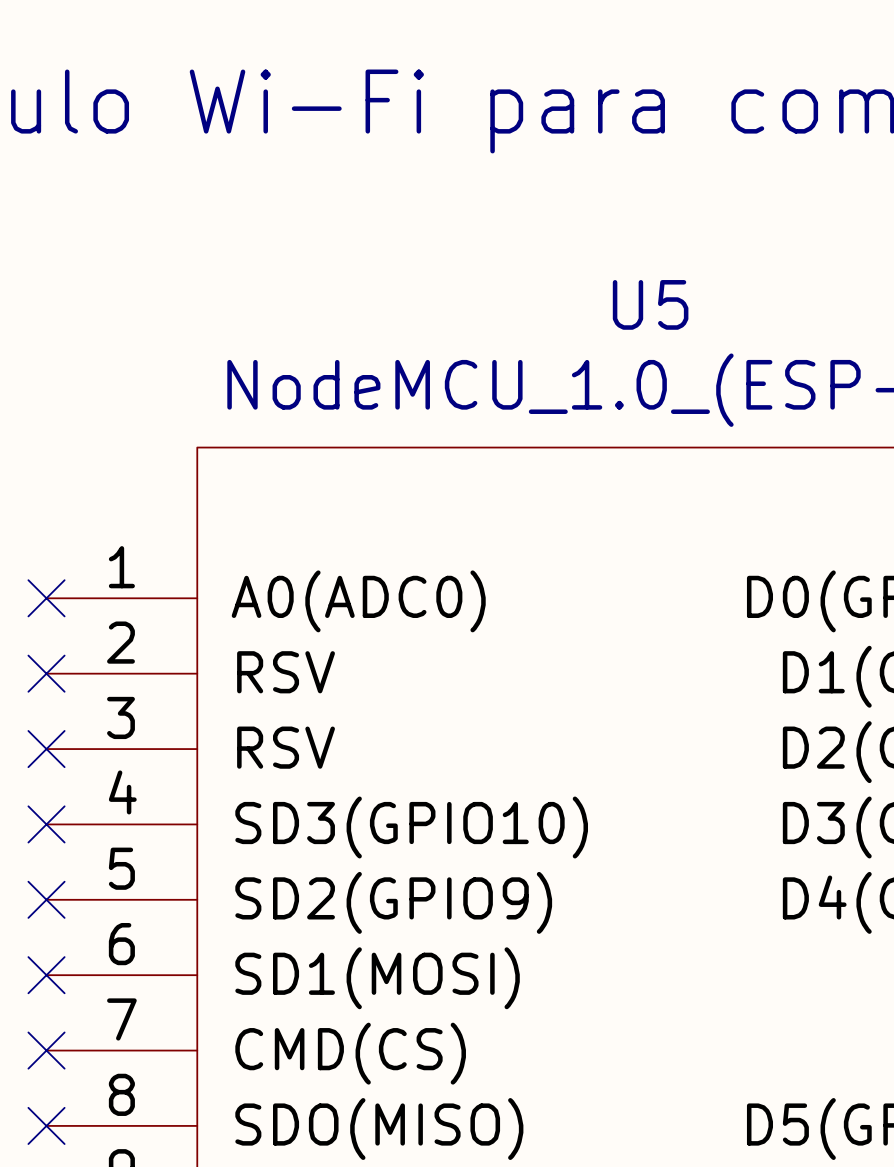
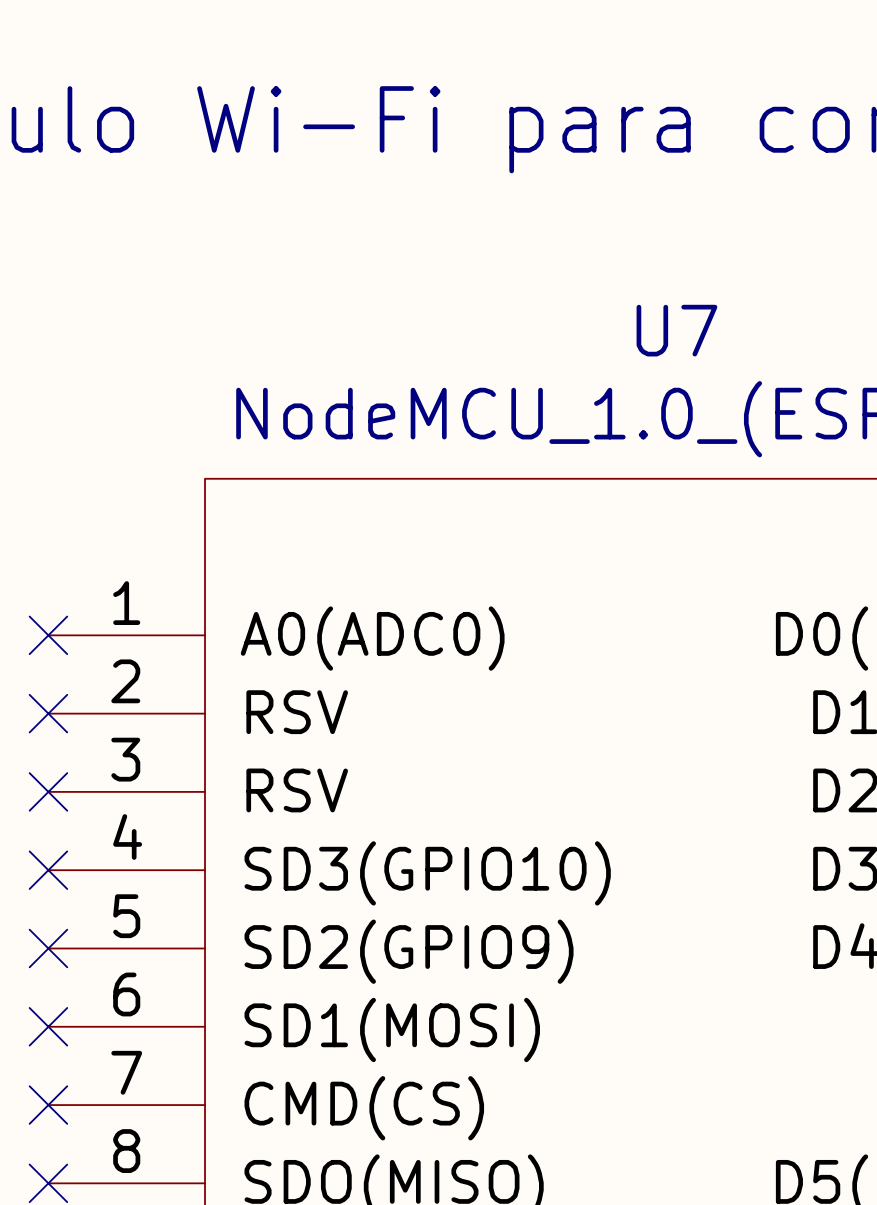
U5 name: U5 (650, 304) -> U7 (676, 330)

